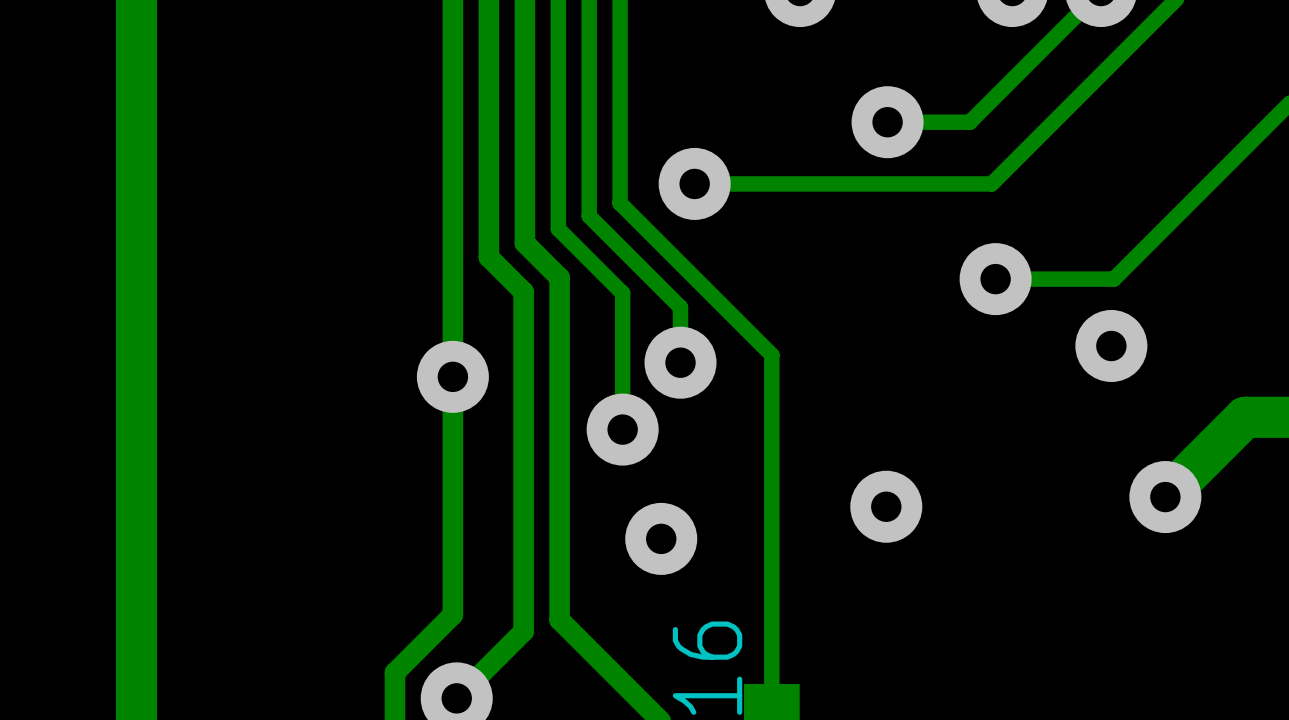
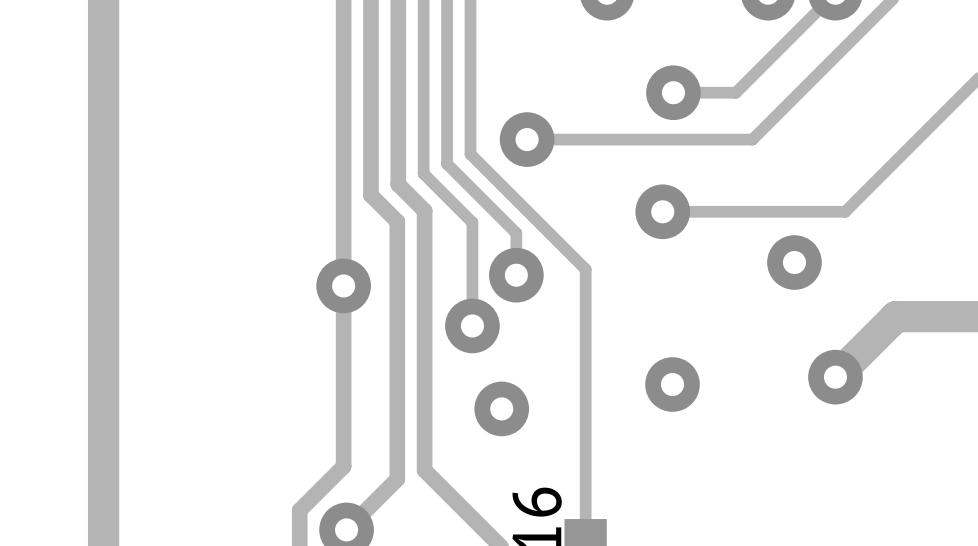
via: none -> (662, 211)
track: none -> (755, 211) (662, 211)
via: (995, 279) -> none
via: none -> (794, 262)
via: (1111, 345) -> none
track: (1245, 417) (1165, 497) -> (944, 316) (895, 316) (835, 377)
via position: (1165, 497) -> (835, 377)

